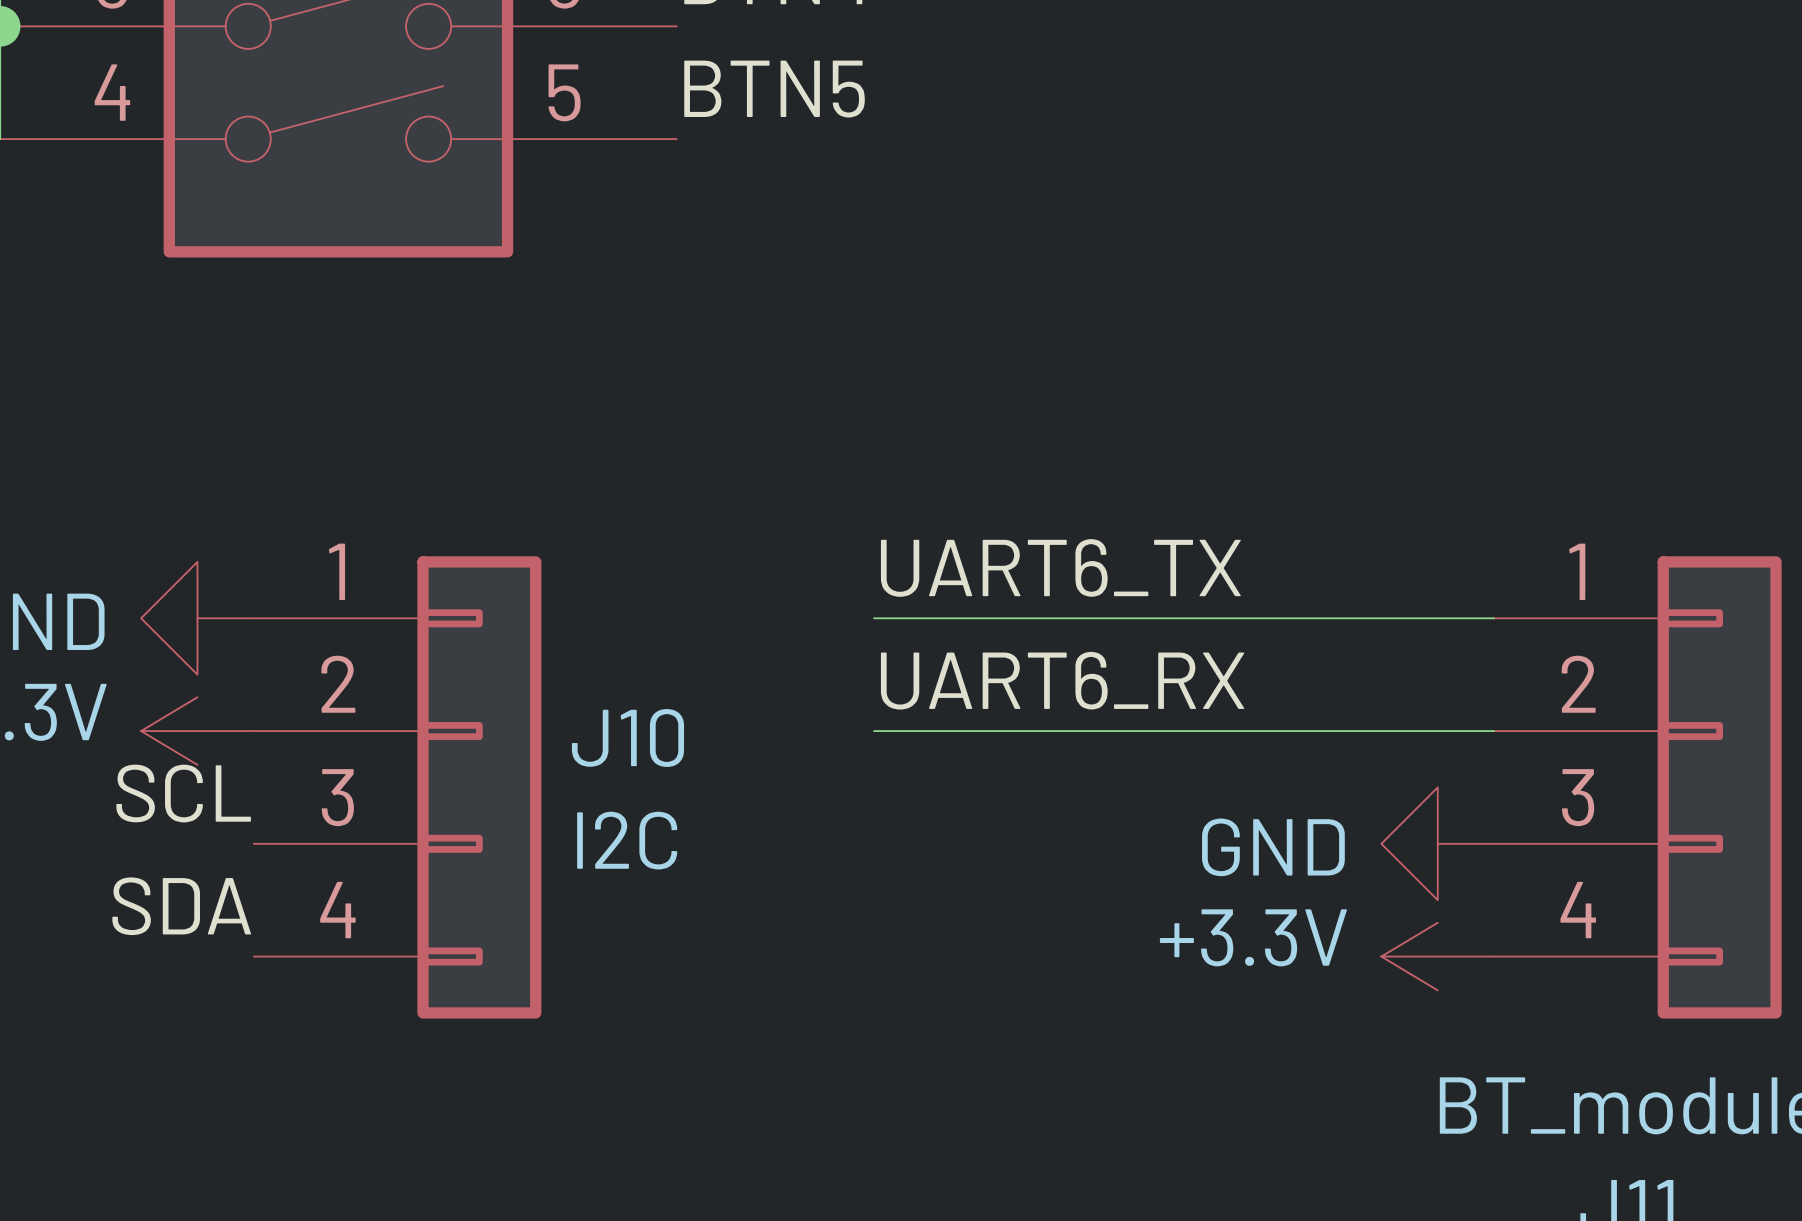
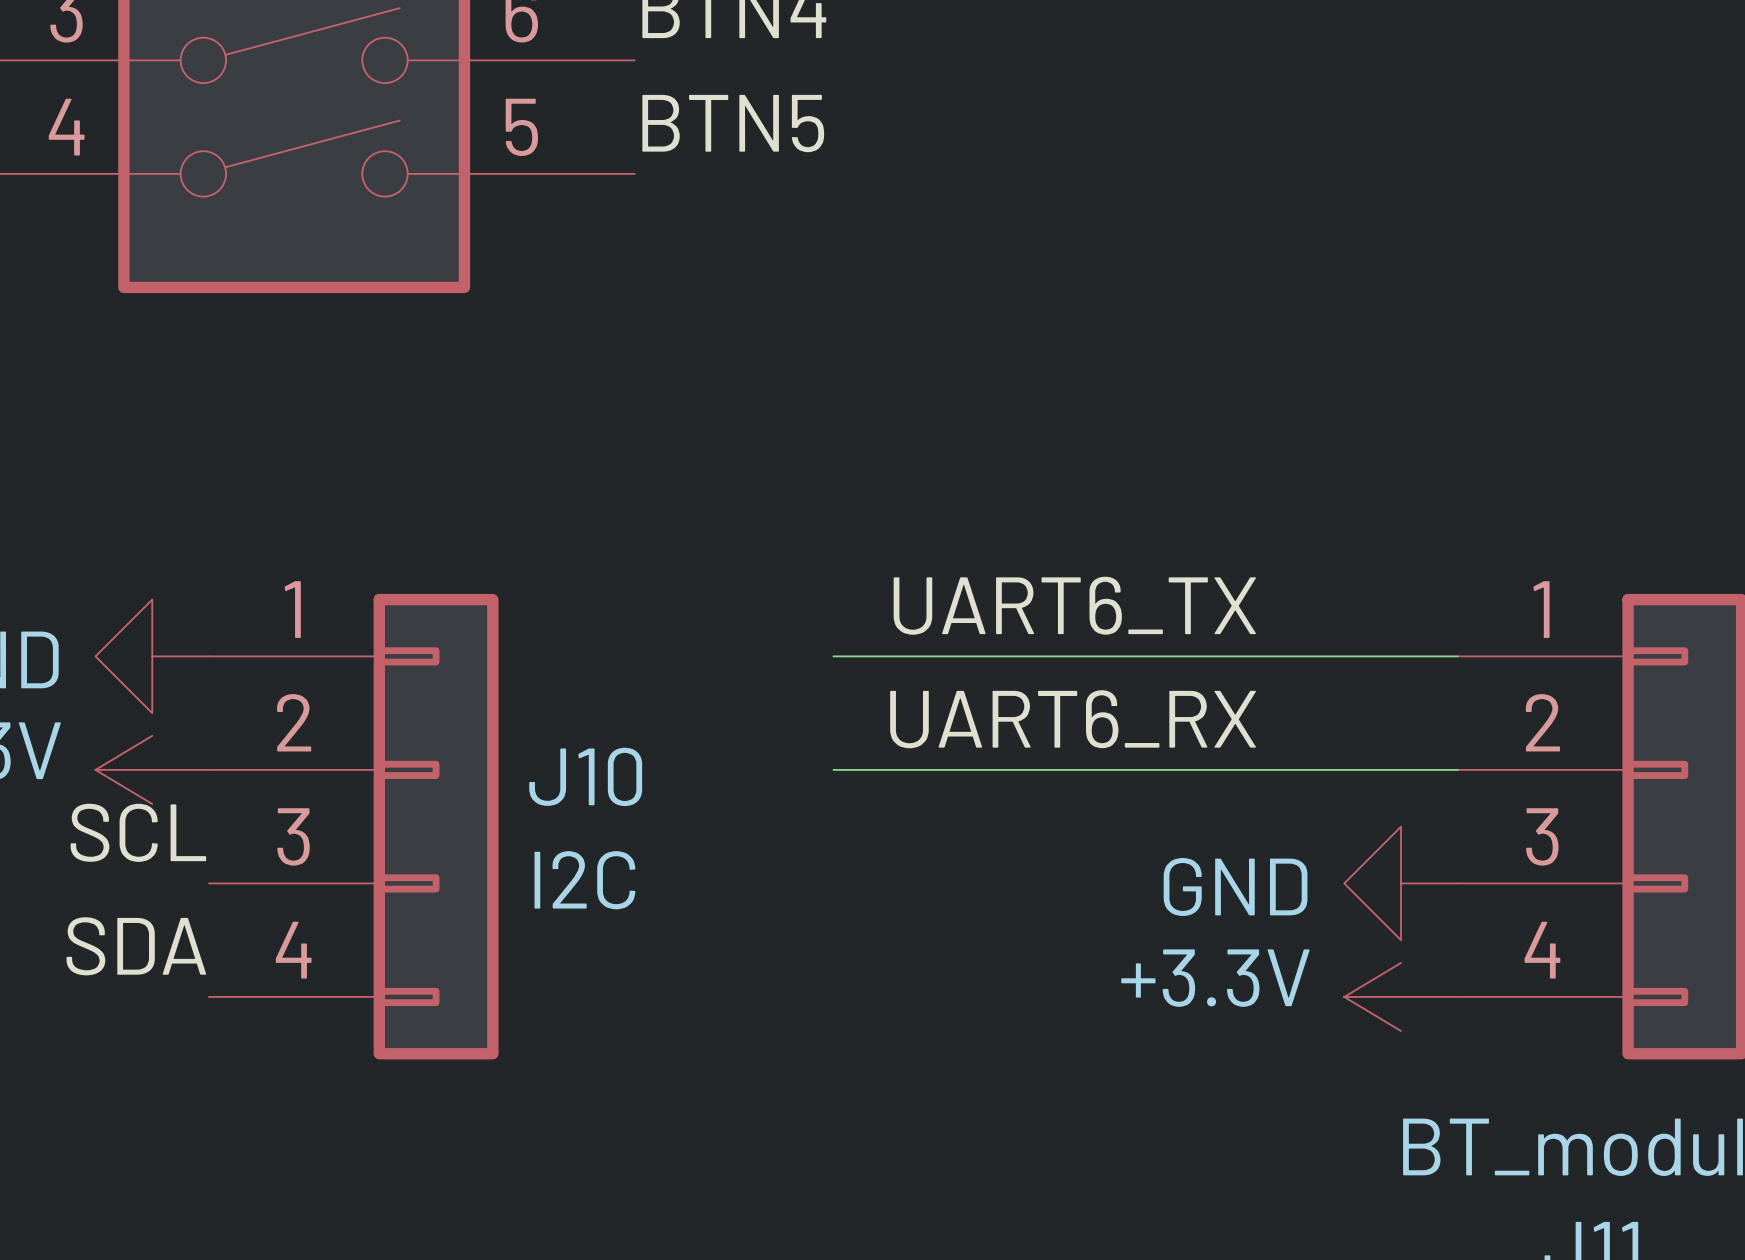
label position: UART6_TX (1060, 567) -> UART6_TX (1074, 605)
label position: UART6_RX (1062, 680) -> UART6_RX (1073, 719)

